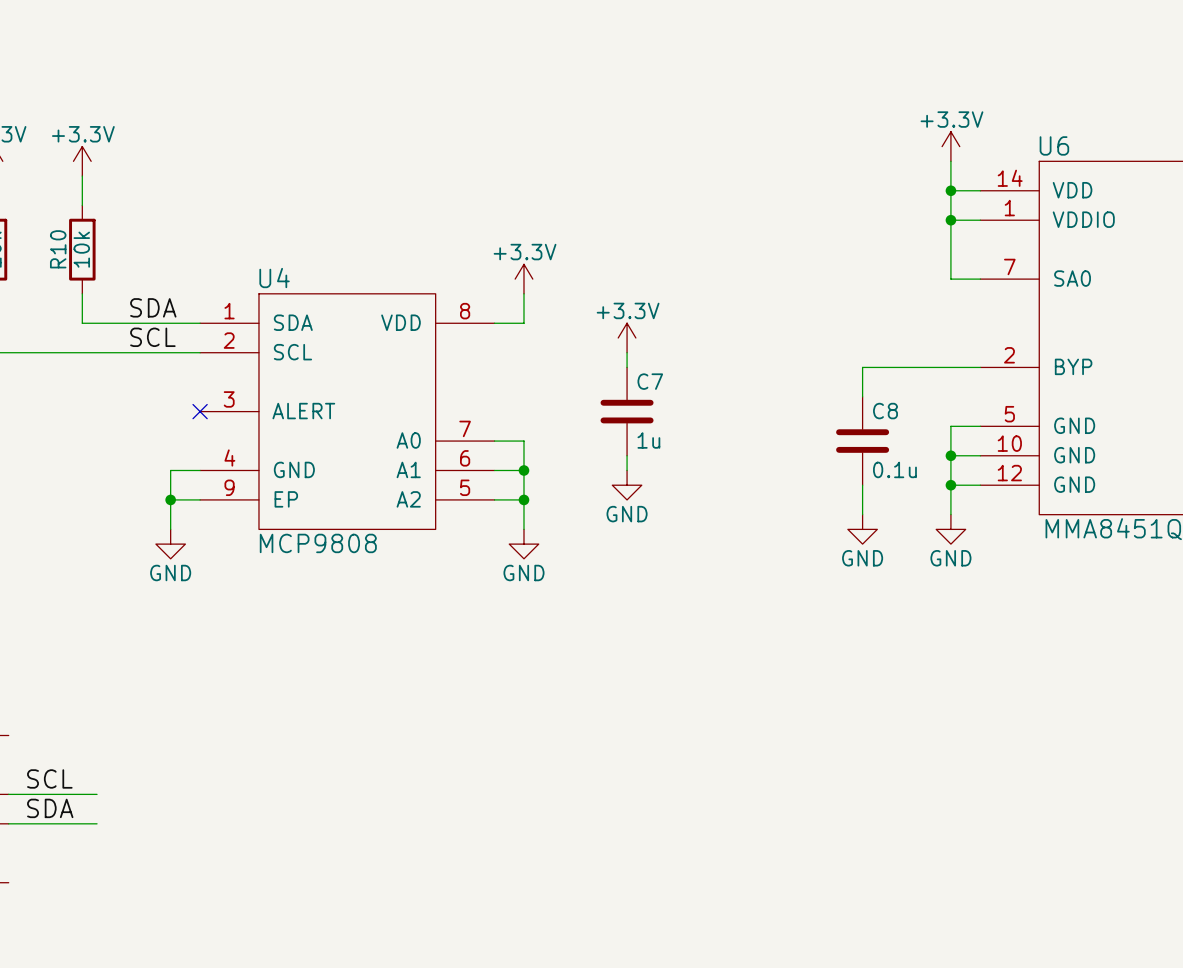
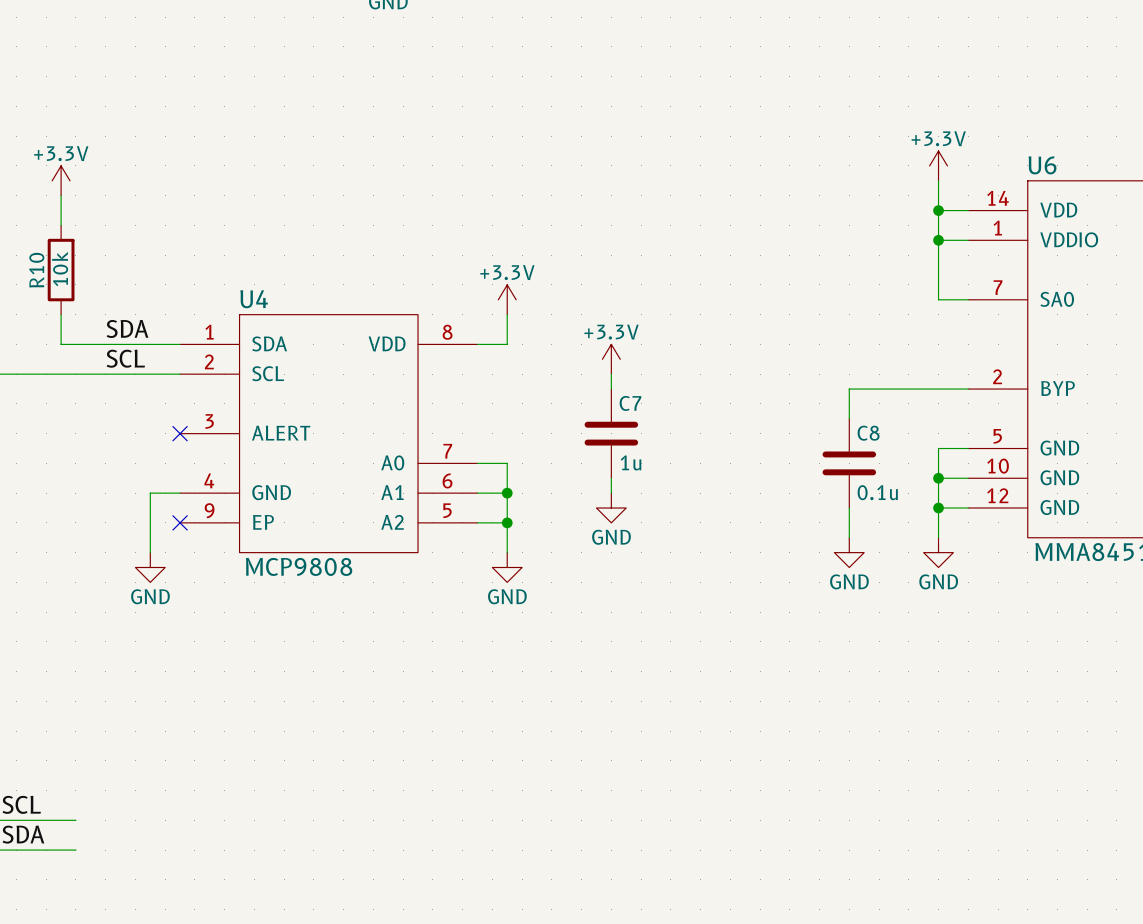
wire: (170, 499) (200, 499) -> none
junction: (170, 499) -> none
no-connect mark: none -> (180, 522)

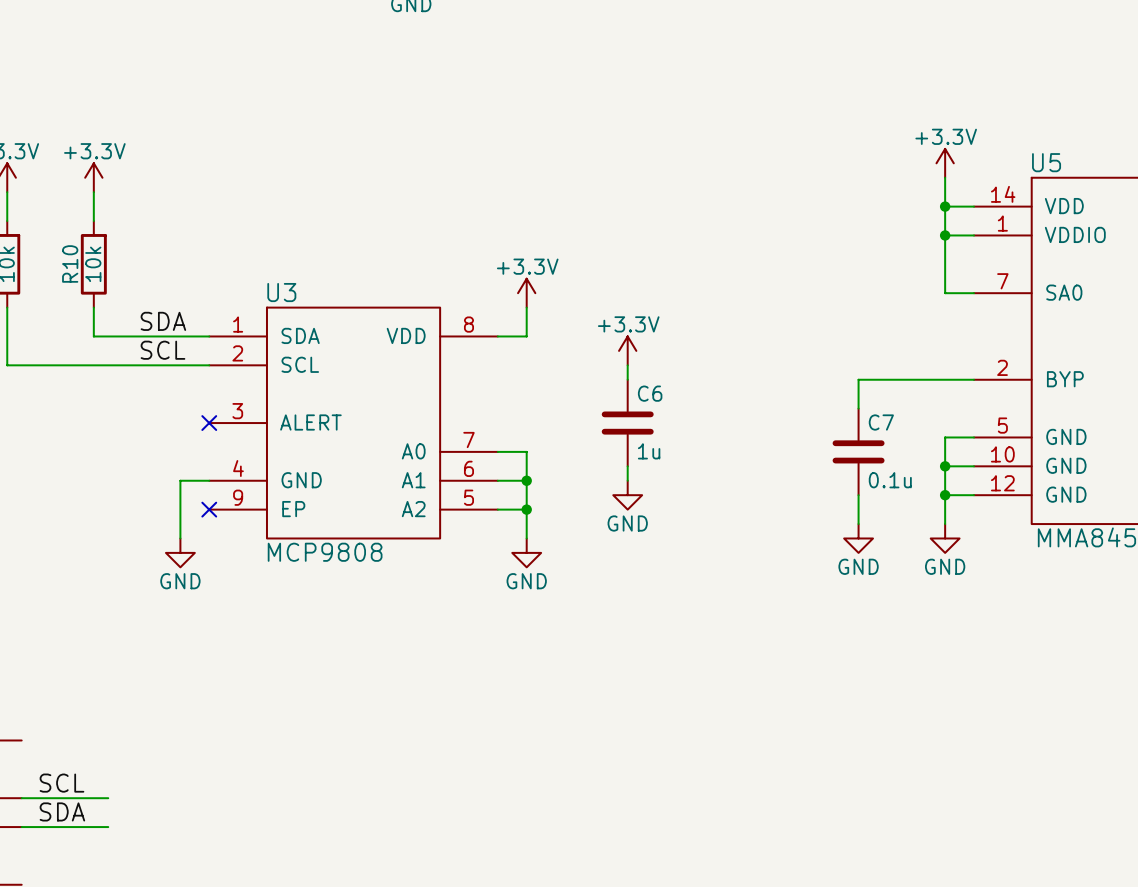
U6 name: U6 (1042, 165) -> U5 (1046, 162)
U4 name: U4 (254, 299) -> U3 (281, 292)
C7 name: C7 (630, 403) -> C6 (650, 393)
C8 name: C8 (868, 433) -> C7 (881, 422)

